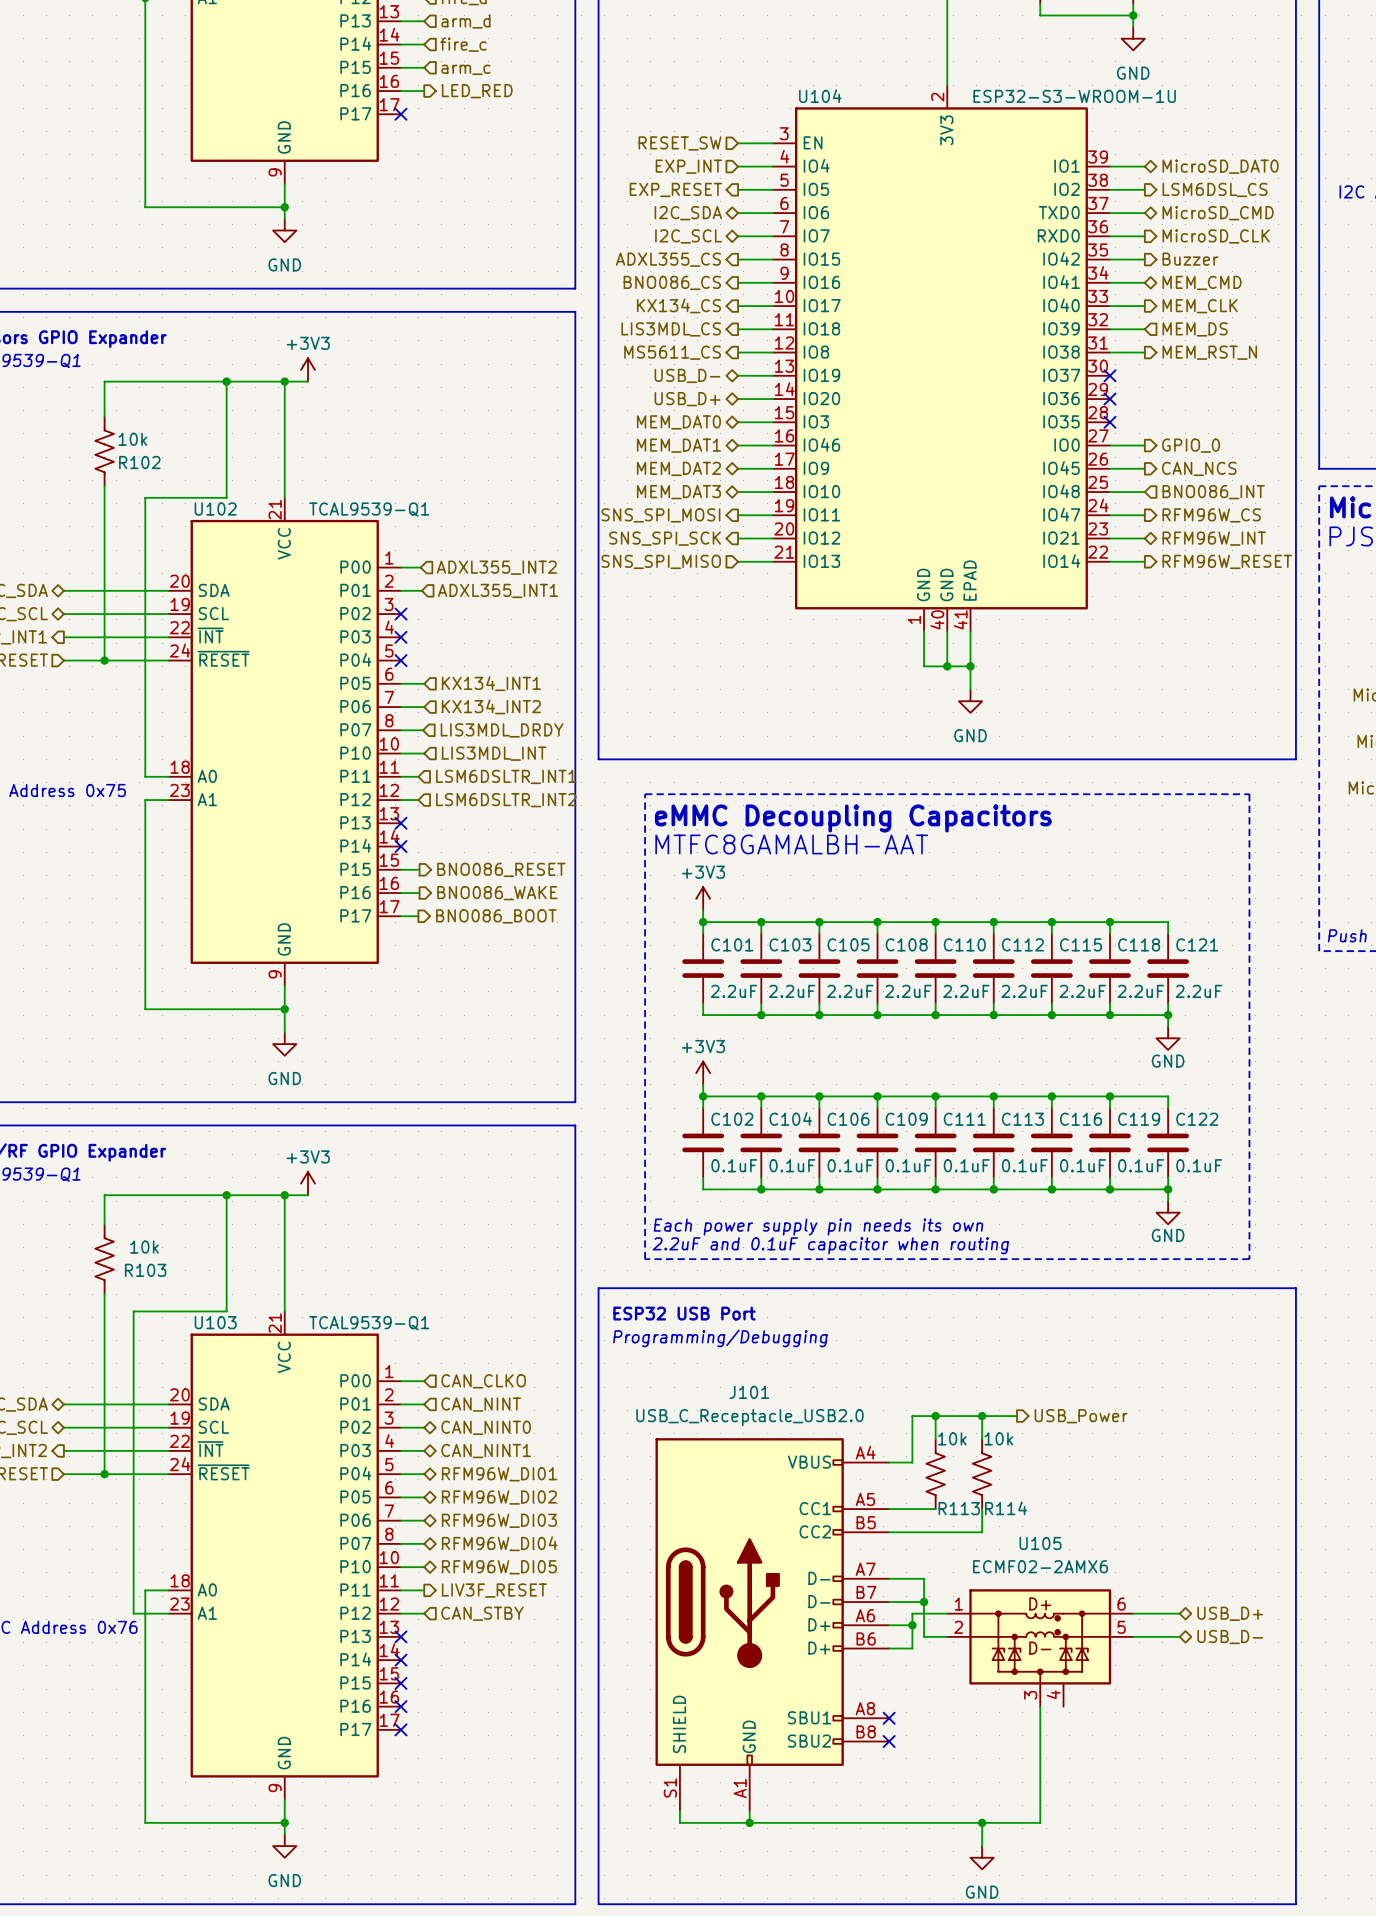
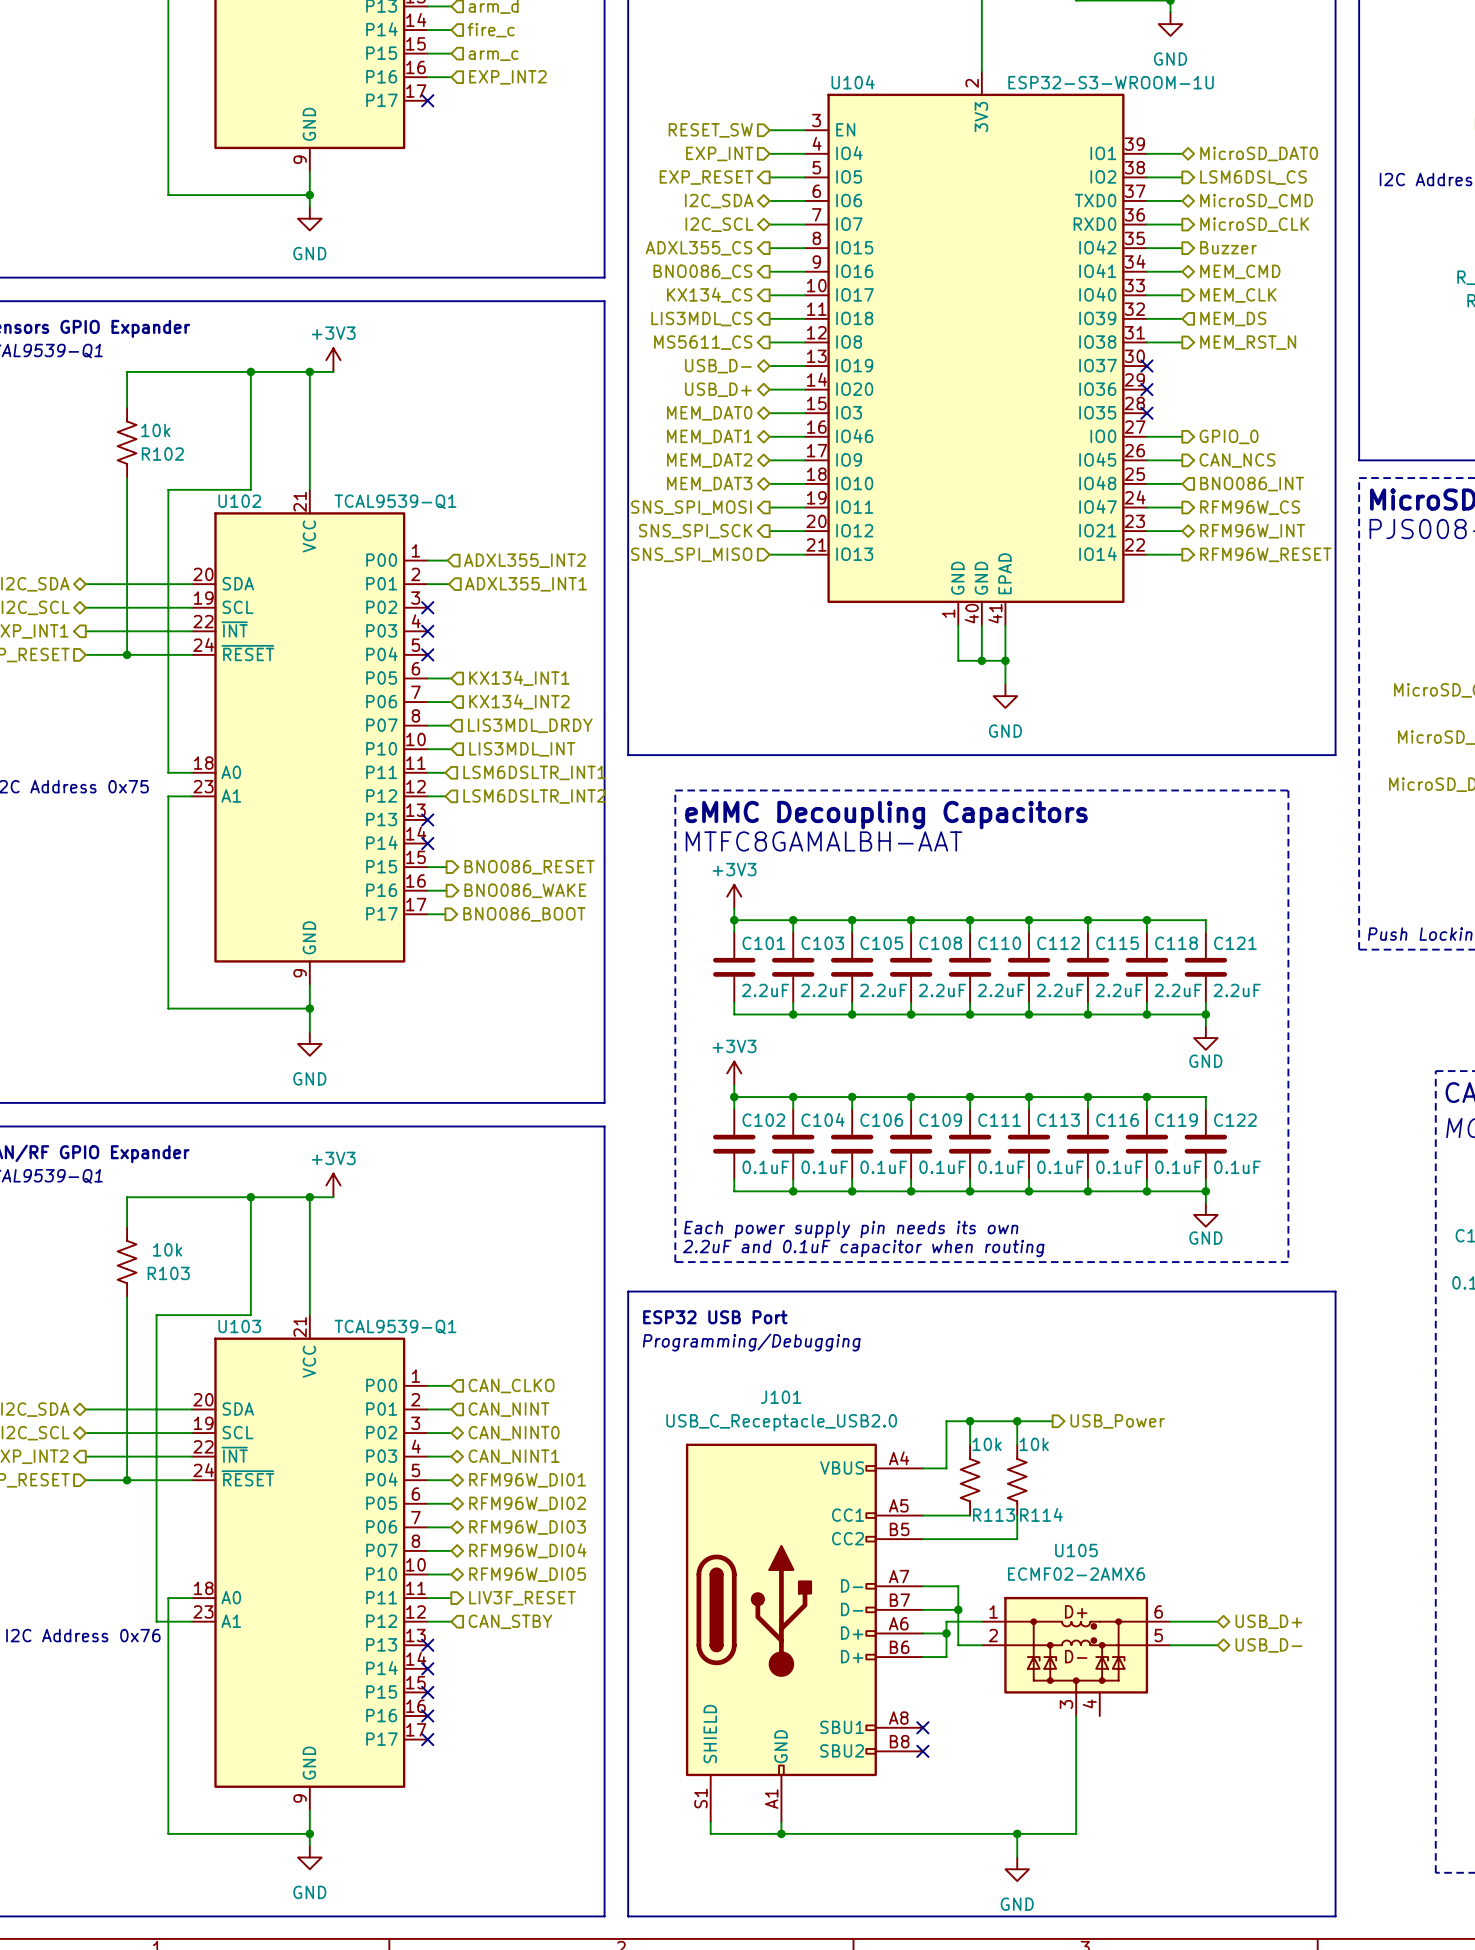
hierarchical label shape: output (477, 91) -> input (507, 77)
hierarchical label: LED_RED (477, 91) -> EXP_INT2 (507, 77)

